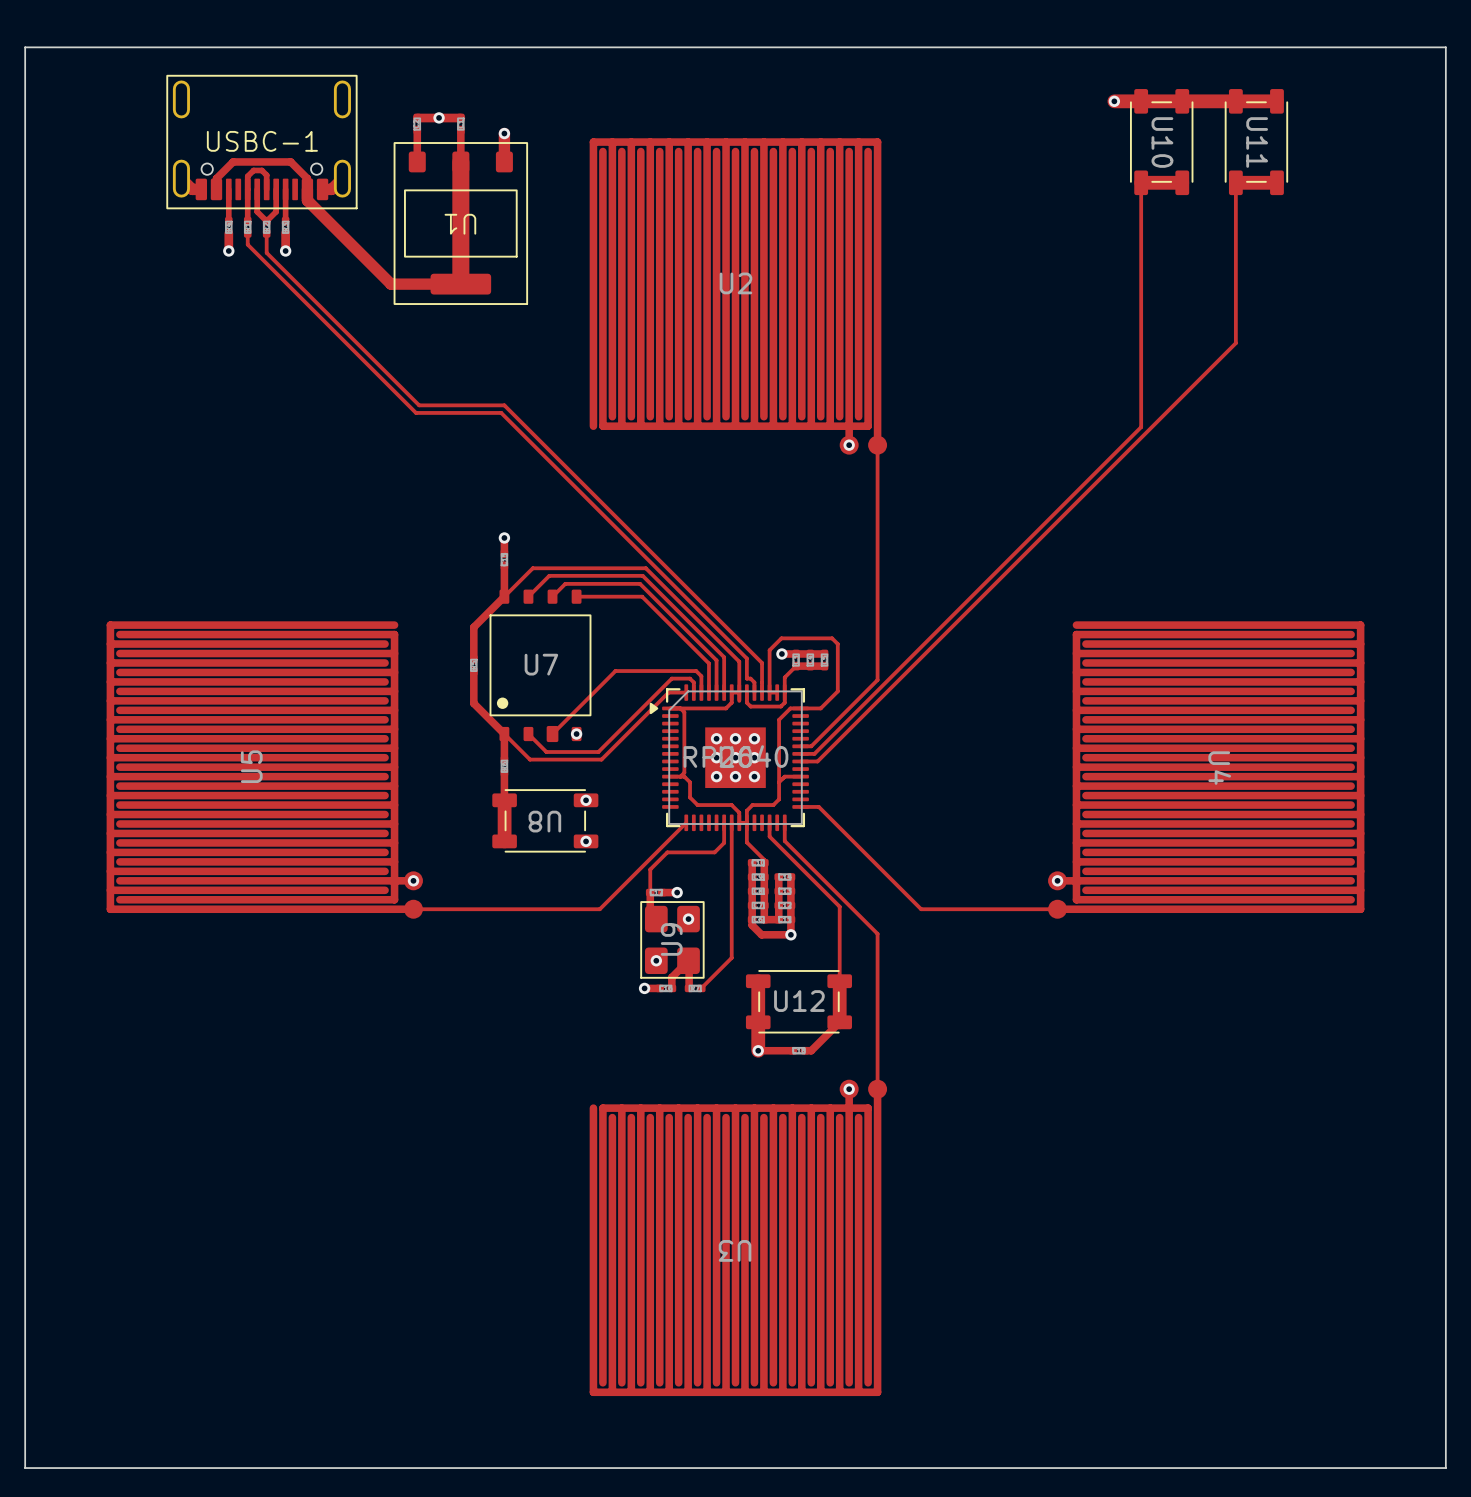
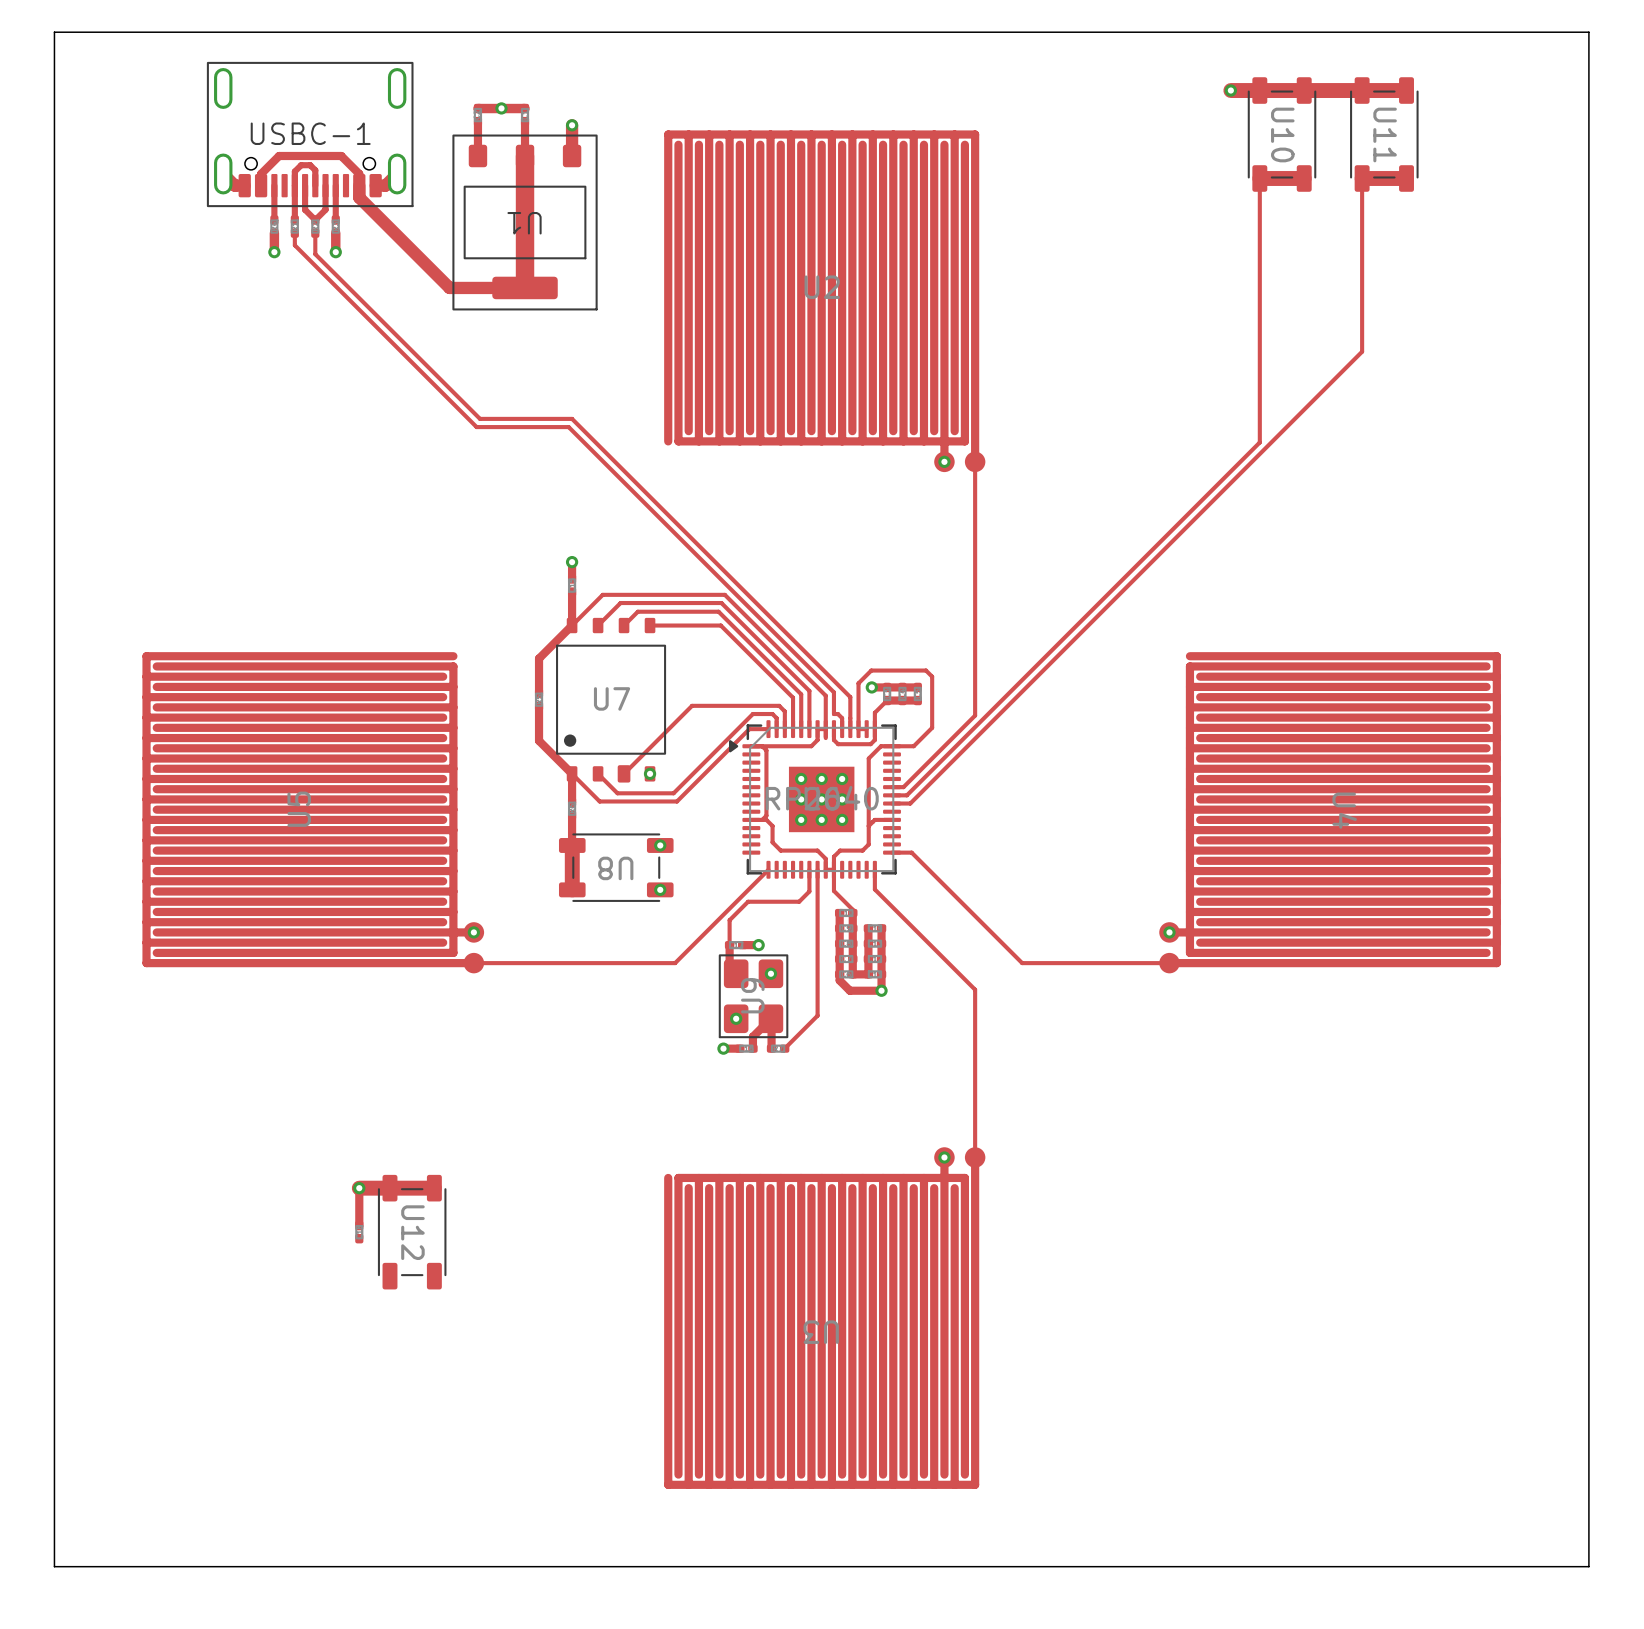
top track: (769, 822) (769, 836) (839, 906) (839, 1022) (811, 1050) (805, 1050) -> none
top track: (758, 981) (758, 1050) (792, 1050) -> none
U12 rotation: 0° (798, 1001) -> 90° clockwise (412, 1232)
U12 position: (798, 1001) -> (412, 1232)
via: (758, 1050) -> none
part rotation: 0° (798, 1050) -> 90° clockwise (359, 1232)
part position: (798, 1050) -> (359, 1232)
via: none -> (359, 1188)
top track: none -> (434, 1188) (359, 1188) (359, 1225)

